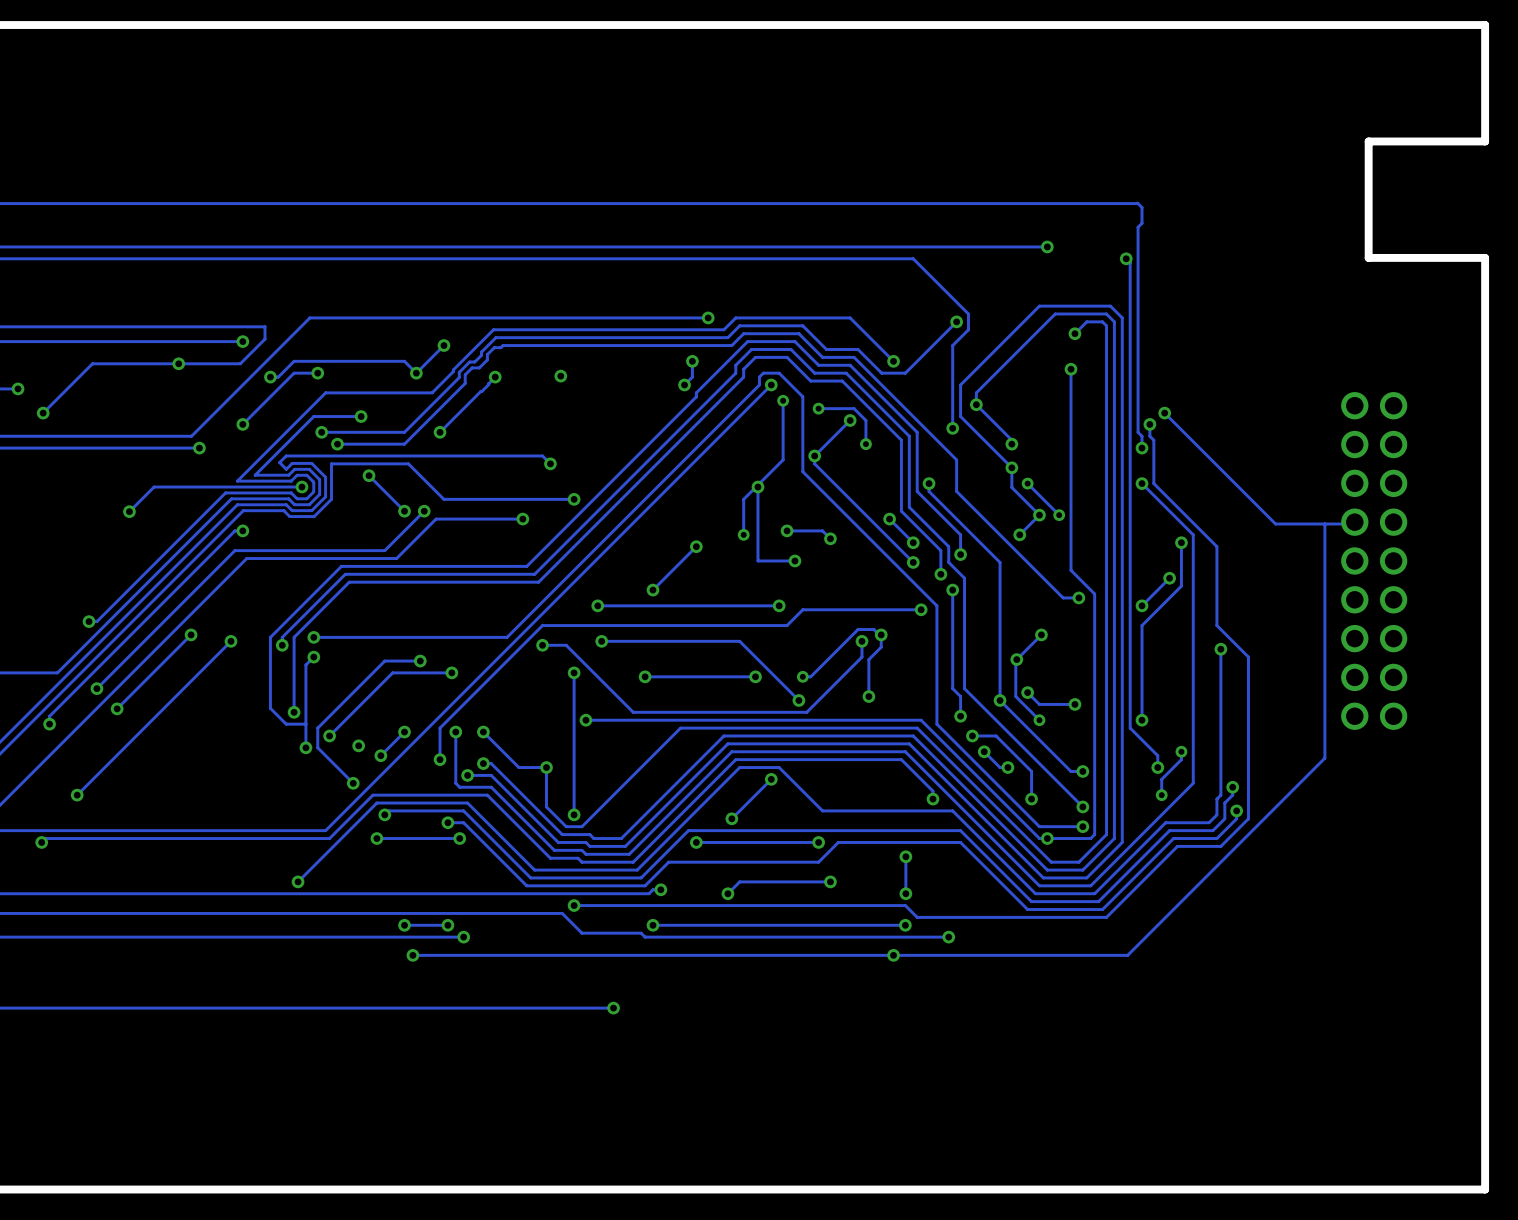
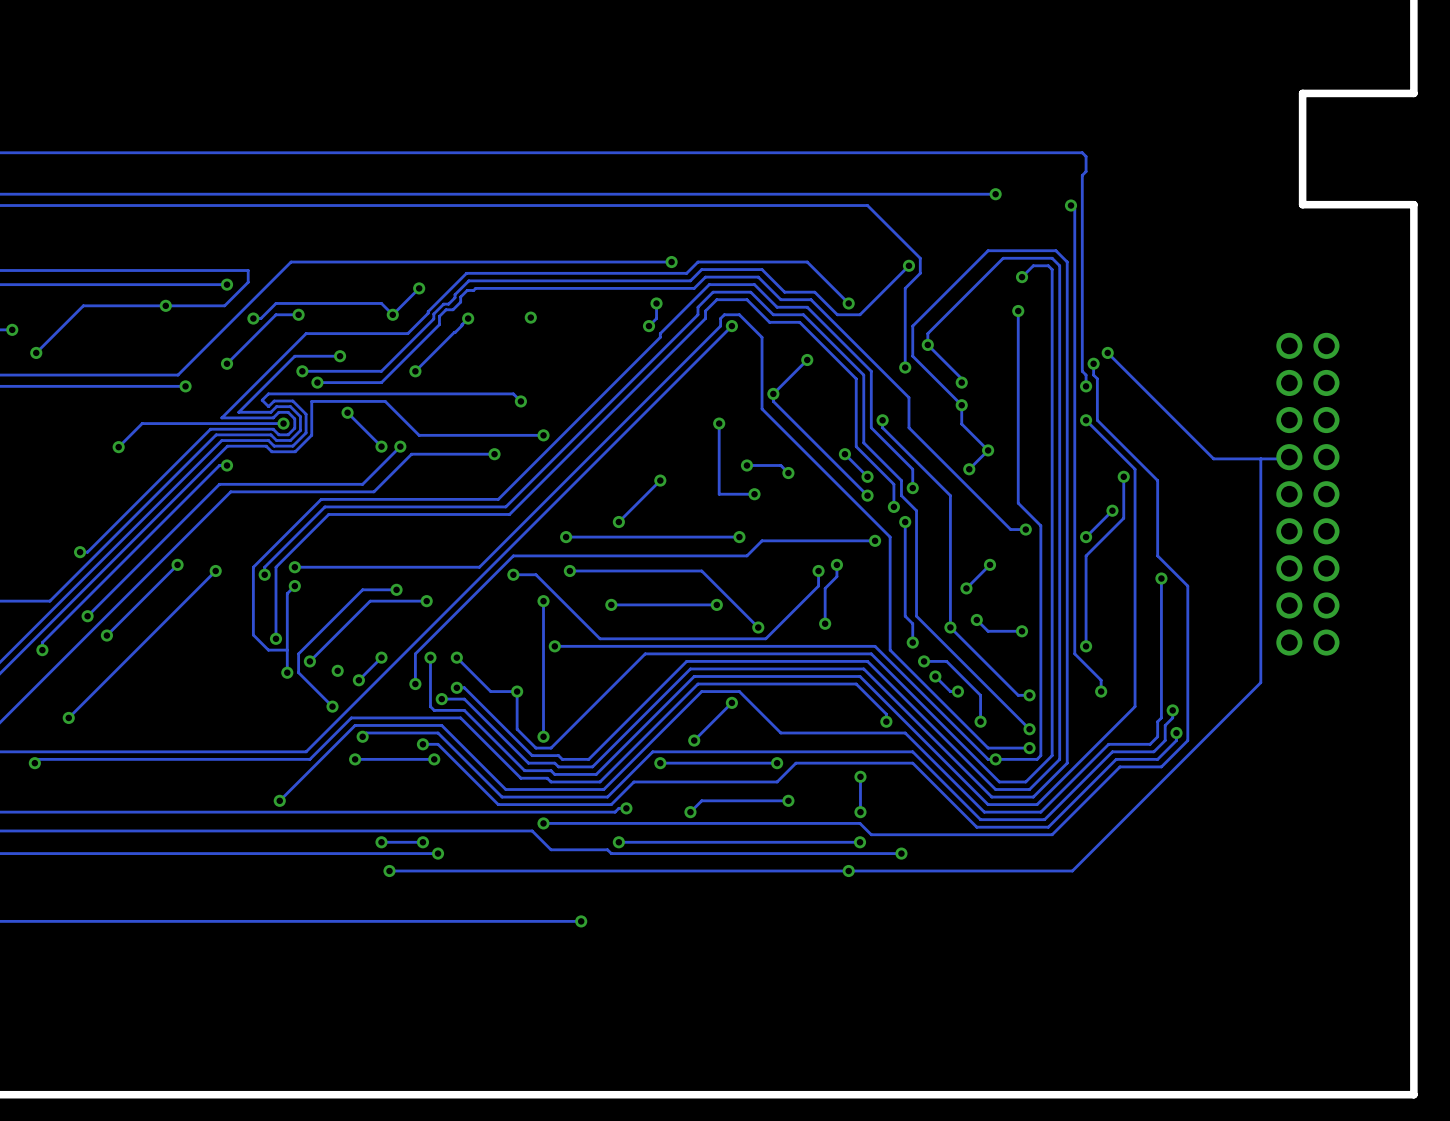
track: (783, 400) (783, 459) (743, 499) (743, 534) -> none
via: (783, 400) -> none
track: (818, 408) (854, 408) (865, 420) (865, 444) -> none
via: (818, 408) -> none
via: (865, 444) -> none
track: (1027, 483) (1059, 515) -> none
via: (1027, 483) -> none
via: (1059, 515) -> none
via: (743, 534) -> none
track: (881, 634) (873, 629) (858, 629) (810, 676) (802, 676) -> none
track: (1016, 659) (1015, 696) (1039, 720) -> none
via: (802, 676) -> none
via: (1039, 720) -> none
track: (1181, 751) (1181, 759) (1161, 779) (1161, 795) -> none
via: (1181, 751) -> none
via: (1161, 795) -> none

